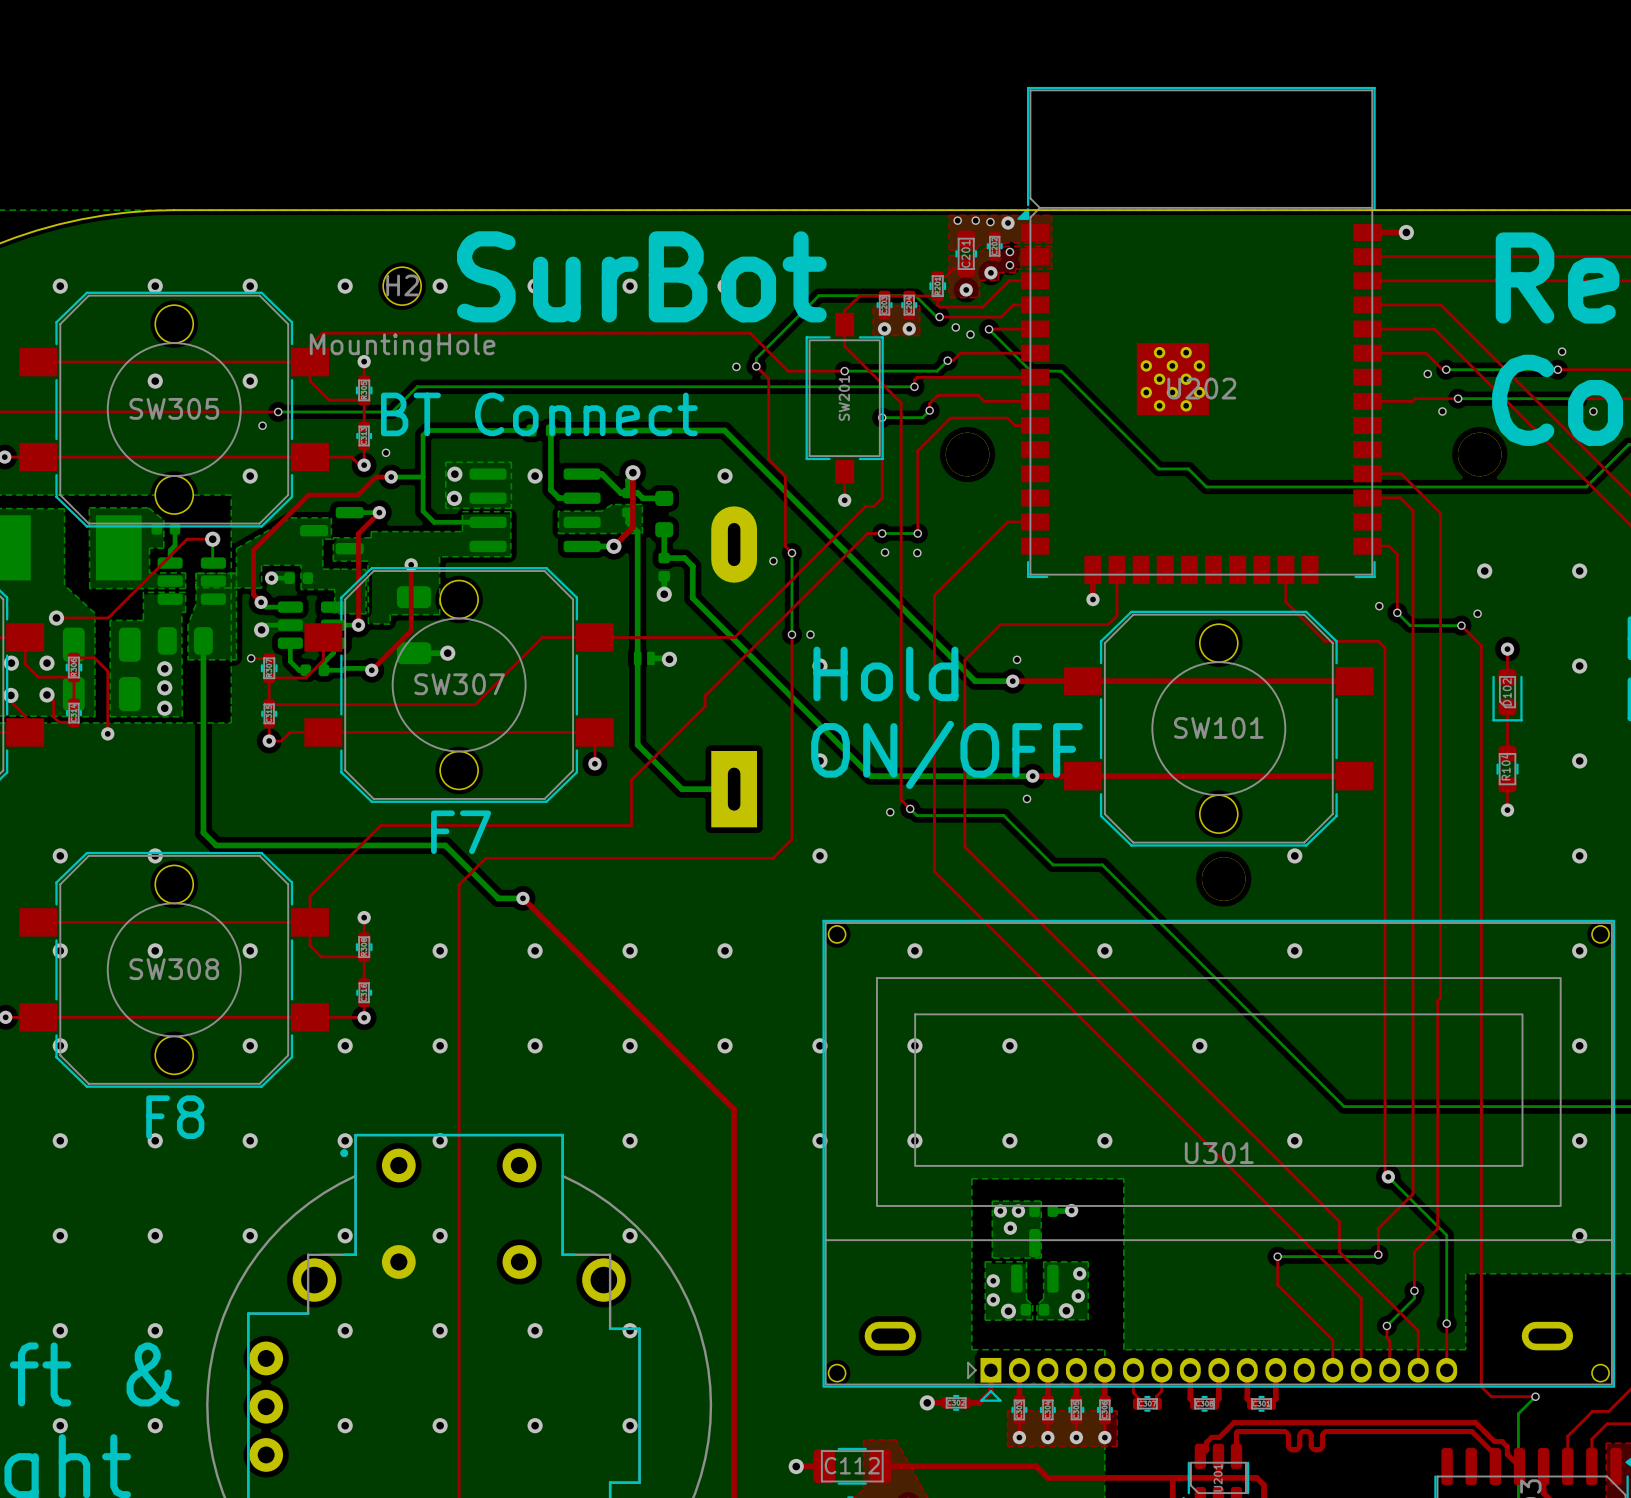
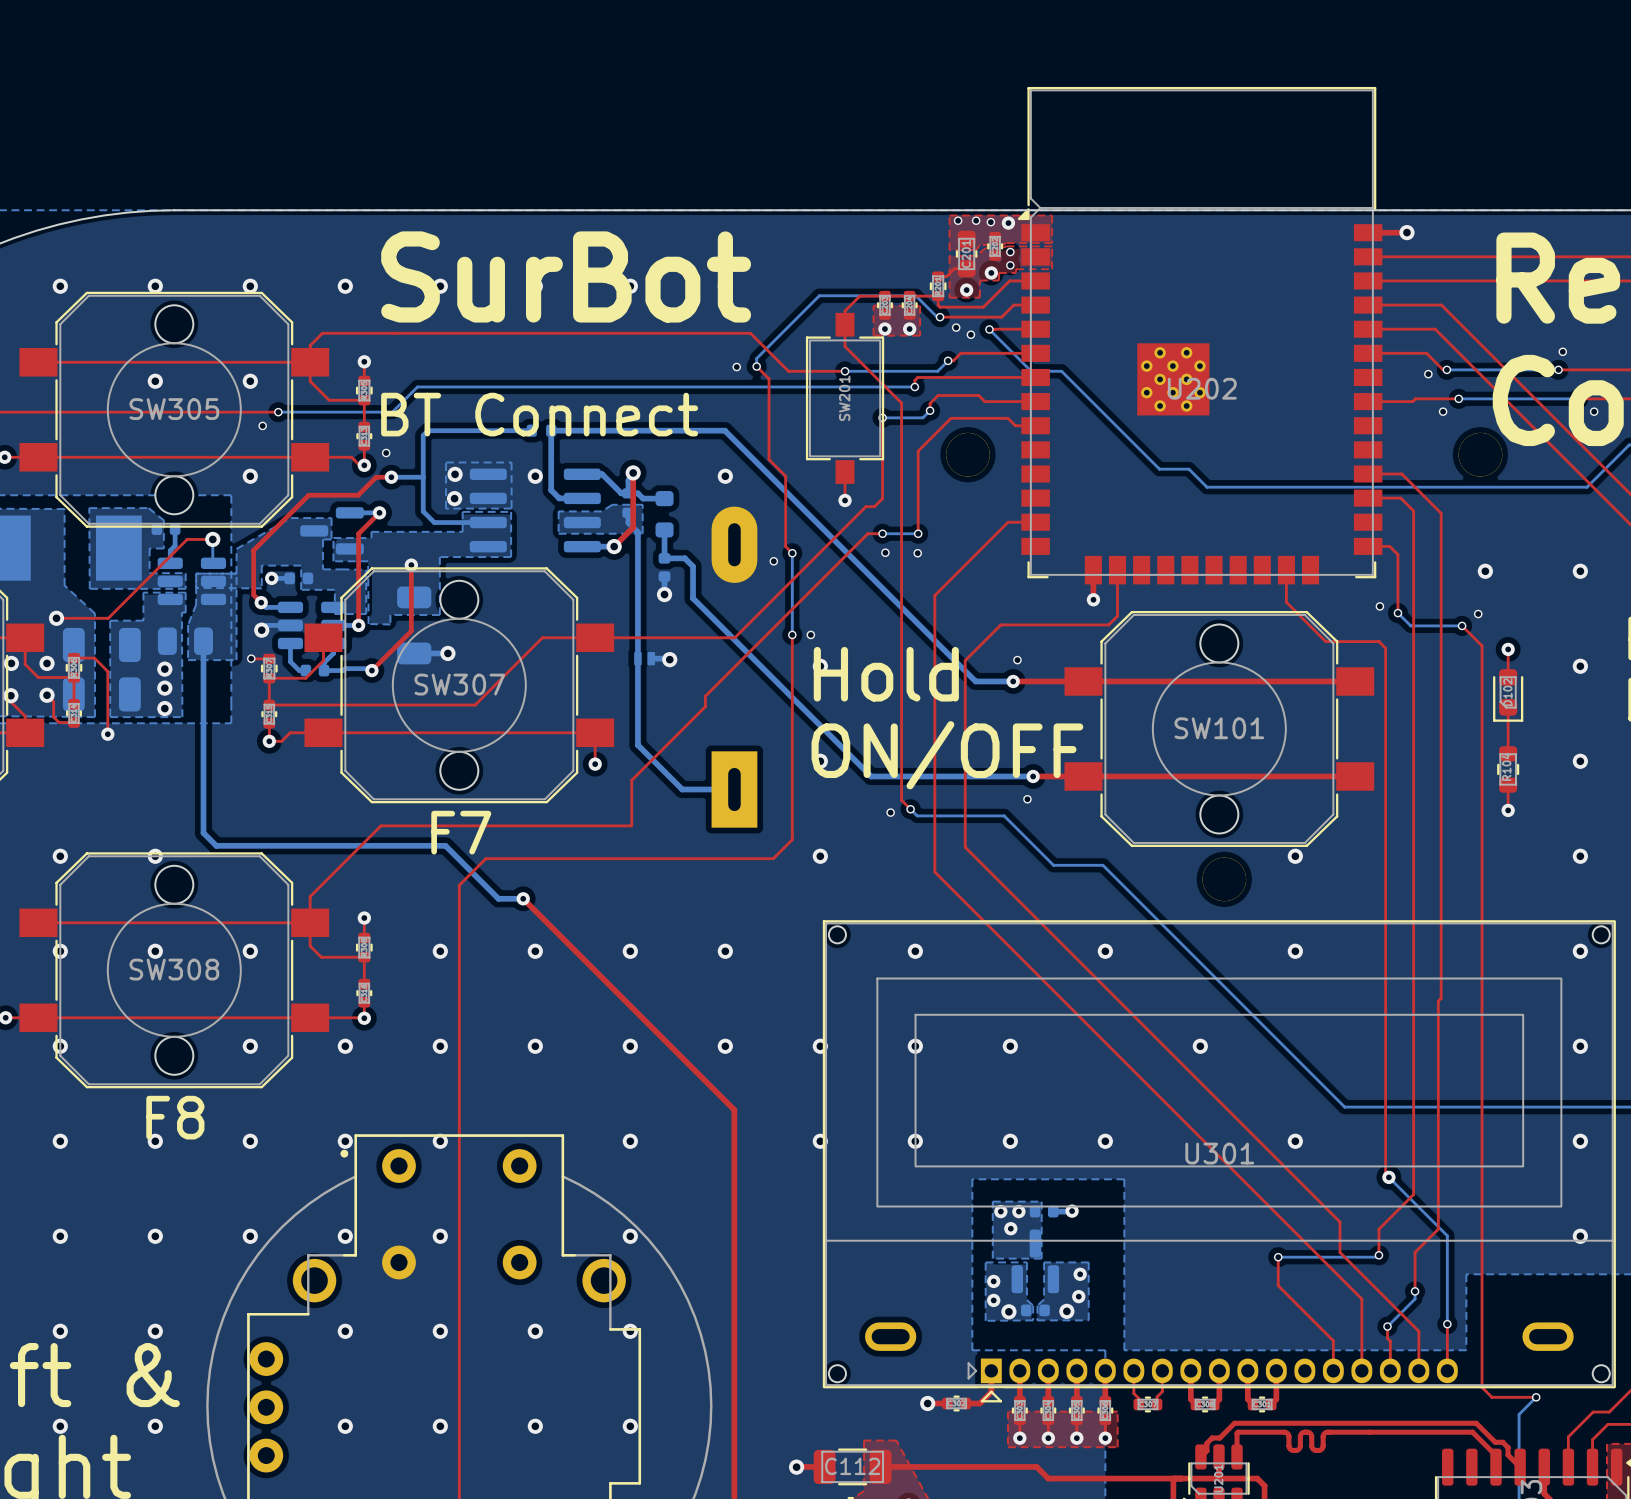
text position: SurBot (641, 276) -> SurBot (566, 276)
H2: MountingHole (402, 286) -> none

